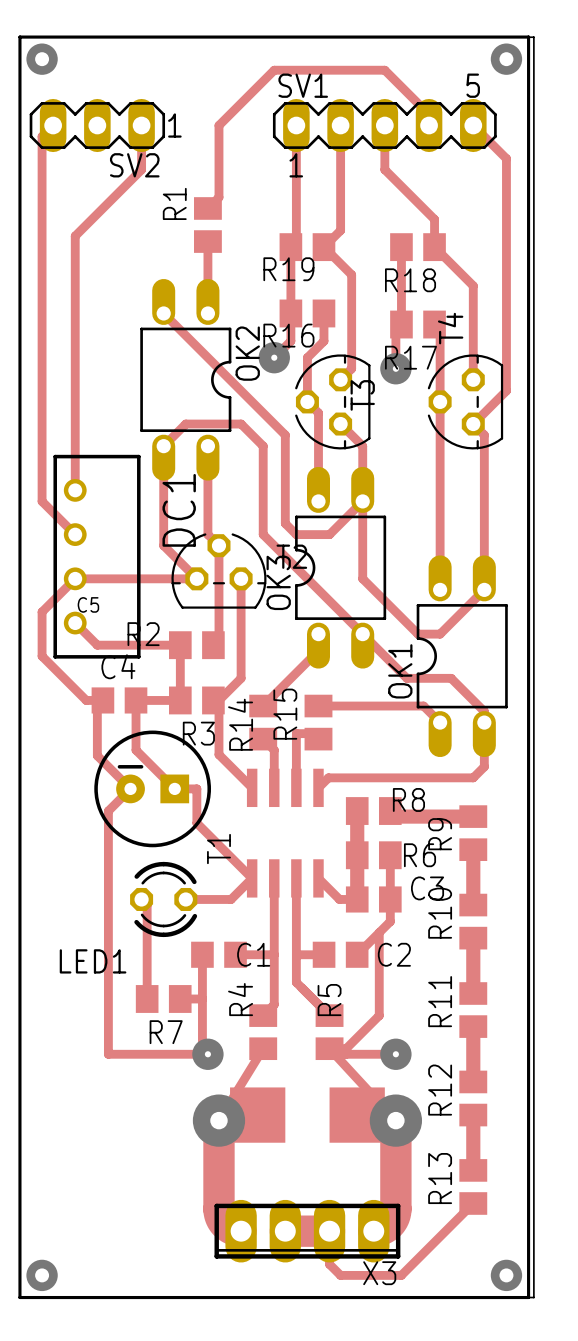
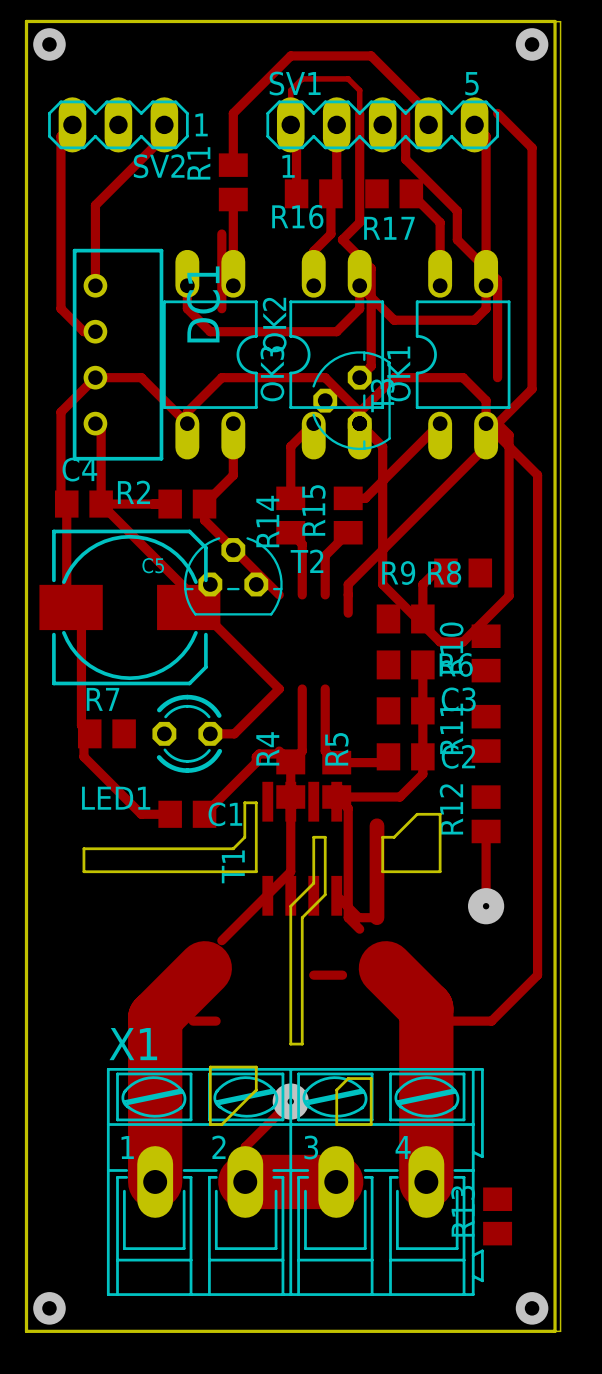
track: (351, 70) (384, 70) (429, 114) (429, 125) -> (371, 55) (428, 113) (428, 124)
track: (53, 125) (42, 136) (42, 501) (75, 534) -> none
SV2 position: (97, 125) -> (118, 124)
track: (141, 125) (141, 169) (75, 236) (75, 490) -> none
track: (296, 125) (296, 241) (290, 247) (290, 341) (274, 357) -> none
track: none -> (359, 113) (359, 90) (348, 78) (302, 78) (290, 90) (290, 124) (296, 130) (296, 193)
SV1 position: (384, 125) -> (382, 124)
track: none -> (72, 124) (60, 136) (60, 308) (83, 331) (95, 331)
track: none -> (164, 124) (164, 136) (95, 205) (95, 285)
track: none -> (336, 124) (336, 188) (330, 193) (330, 234) (313, 251) (313, 285)
track: none -> (474, 124) (486, 136) (486, 308) (474, 320) (394, 320) (359, 285) (359, 308) (336, 331) (210, 331) (187, 308) (187, 285)
track: (218, 175) (218, 197) (207, 208) -> none
track: none -> (411, 193) (440, 222) (440, 285)
track: none -> (233, 199) (233, 285)
R1 position: (207, 225) -> (233, 182)
R19: (307, 247) -> none
track: (401, 247) (401, 324) (395, 330) (395, 368) -> none
R18: (418, 247) -> none
track: (163, 313) (285, 435) (285, 523) (296, 534) (329, 534) (362, 501) -> none
R16 position: (307, 313) -> (313, 193)
track: (323, 313) (323, 341) (307, 357) (307, 401) (318, 412) (318, 501) -> none
R17 position: (418, 324) -> (394, 193)
track: (434, 324) (440, 330) (440, 589) -> none
via: (274, 357) -> none
via: (395, 368) -> none
OK2 position: (185, 379) -> (210, 354)
T4: (465, 401) -> none
track: none -> (95, 423) (101, 429) (101, 504)
track: none -> (233, 423) (233, 475) (204, 504) (204, 520) (279, 594)
track: none -> (313, 423) (290, 446) (290, 498)
track: none -> (440, 423) (365, 498) (348, 498)
track: none -> (486, 423) (537, 475) (537, 975) (491, 1021) (440, 1021)
track: (207, 446) (207, 534) (218, 545) (218, 639) (213, 645) -> none
track: none -> (101, 504) (170, 504)
track: none -> (101, 504) (193, 595) (193, 603) (188, 607) (197, 607) (279, 688) (234, 733) (210, 733)
track: none -> (290, 532) (302, 544) (302, 594)
track: none -> (348, 532) (325, 555) (325, 594)
DC1 position: (97, 556) -> (118, 354)
OK3 position: (340, 567) -> (336, 354)
track: none -> (445, 573) (434, 573) (422, 584) (422, 618)
track: (241, 578) (241, 678) (218, 700) (213, 700) (218, 706) (218, 754) (252, 787) -> none
C5 name position: C5 (88, 604) -> C5 (153, 565)
track: none -> (81, 612) (81, 725) (89, 733) (83, 739) (83, 756) (141, 814) (170, 814)
track: none -> (348, 613) (348, 584) (486, 446) (486, 400) (463, 377) (394, 377) (359, 412) (325, 377) (221, 377) (187, 412) (187, 423) (141, 377) (95, 377) (60, 412) (60, 504) (66, 504) (66, 606) (95, 619)
track: (75, 623) (97, 645) (180, 645) (180, 694) (174, 700) -> none
track: (318, 634) (318, 650) (263, 706) -> none
R2 position: (196, 645) -> (187, 504)
track: none -> (422, 664) (422, 774) (399, 797) (336, 797) (348, 808) (348, 917) (359, 929)
OK1 position: (462, 656) -> (463, 354)
track: none -> (302, 688) (302, 751) (290, 762)
track: none -> (325, 688) (325, 751) (336, 762) (382, 762) (388, 756)
C4 position: (119, 700) -> (83, 504)
track: (180, 700) (136, 700) (136, 750) (174, 788) (196, 788) (196, 823) (252, 878) (231, 899) (185, 899) -> none
R3: (196, 700) -> none
track: (318, 706) (423, 706) (440, 722) -> none
R14 position: (263, 722) -> (290, 515)
R15 position: (318, 722) -> (348, 515)
C5 footprint: [94, 730, 212, 848] -> [39, 529, 221, 686]
track: (318, 739) (313, 733) (296, 733) (296, 787) -> none
track: none -> (299, 753) (259, 753) (256, 756) (256, 762) (204, 814)
track: none -> (290, 801) (290, 871) (221, 940)
track: (318, 787) (328, 777) (473, 777) (484, 766) (484, 711) (451, 678) (406, 678) (263, 534) (263, 446) (241, 424) (185, 424) (163, 446) (163, 545) (196, 578) (75, 578) (42, 612) (42, 656) (86, 700) (102, 700) (97, 706) (97, 755) (130, 788) (108, 811) (108, 1054) (207, 1054) -> none
board edge: none -> (244, 802) (256, 802) (256, 871) (83, 871) (83, 848) (233, 848) (244, 837) (244, 802)
board edge: none -> (417, 814) (440, 814) (440, 871) (382, 871) (382, 837) (394, 837) (417, 814)
R8 name position: R8 (408, 799) -> R8 (444, 573)
R8 position: (373, 811) -> (405, 618)
track: (390, 811) (395, 816) (473, 816) -> none
track: none -> (486, 831) (486, 906)
board edge: none -> (313, 837) (313, 883) (290, 906) (290, 1044) (302, 1044) (302, 917) (325, 894) (325, 837) (313, 837)
R9 rotation: 0° (473, 833) -> 90° clockwise (463, 573)
R9 position: (473, 833) -> (463, 573)
R9 name position: R9 (440, 834) -> R9 (398, 573)
track: (473, 849) (473, 905) -> none
R6 position: (373, 855) -> (405, 664)
track: (390, 855) (390, 921) (357, 954) -> none
track: (274, 878) (274, 1004) (263, 1015) -> none
track: (296, 878) (296, 982) (329, 1015) -> none
via: none -> (486, 906)
track: (141, 899) (147, 905) (147, 998) -> none
LED1 position: (163, 899) -> (187, 733)
C3 position: (373, 899) -> (405, 710)
R10 position: (473, 921) -> (486, 653)
track: (379, 932) (379, 1015) (346, 1048) (329, 1048) (395, 1120) (395, 1214) (387, 1226) (373, 1231) -> none
track: (473, 938) (473, 993) -> none
track: none -> (204, 968) (155, 1017) (155, 1181)
track: none -> (385, 968) (426, 1008) (426, 1181)
track: (202, 954) (202, 1054) -> none
C1 position: (218, 954) -> (187, 814)
track: (235, 954) (274, 954) -> none
C2 position: (340, 954) -> (405, 756)
R7 position: (163, 998) -> (106, 733)
R11 position: (473, 1010) -> (486, 733)
track: (473, 1026) (473, 1081) -> none
R7 name position: R7 (166, 1032) -> R7 (103, 699)
R4 position: (263, 1032) -> (290, 779)
R5 position: (329, 1032) -> (336, 779)
board edge: none -> (210, 1067) (210, 1124) (221, 1124) (256, 1090) (256, 1067) (210, 1067)
track: (263, 1048) (218, 1120) (219, 1214) (227, 1226) (241, 1231) -> none
track: (340, 1048) (345, 1054) (395, 1054) -> none
via: (207, 1054) -> none
board edge: none -> (348, 1078) (336, 1090) (336, 1124) (371, 1124) (371, 1078) (348, 1078)
via: (395, 1054) -> none
track: none -> (290, 1101) (245, 1147) (245, 1181) (336, 1181)
via: none -> (290, 1101)
drawing: [230, 1087, 286, 1143] -> none
drawing: [329, 1087, 385, 1143] -> none
R12 position: (473, 1098) -> (486, 814)
track: (473, 1115) (473, 1170) -> none
via: (218, 1120) -> none
via: (395, 1120) -> none
X1: none -> (295, 1181)
track: (473, 1203) (401, 1275) (340, 1275) (329, 1264) (329, 1231) (285, 1231) -> none
X3: (307, 1231) -> none

